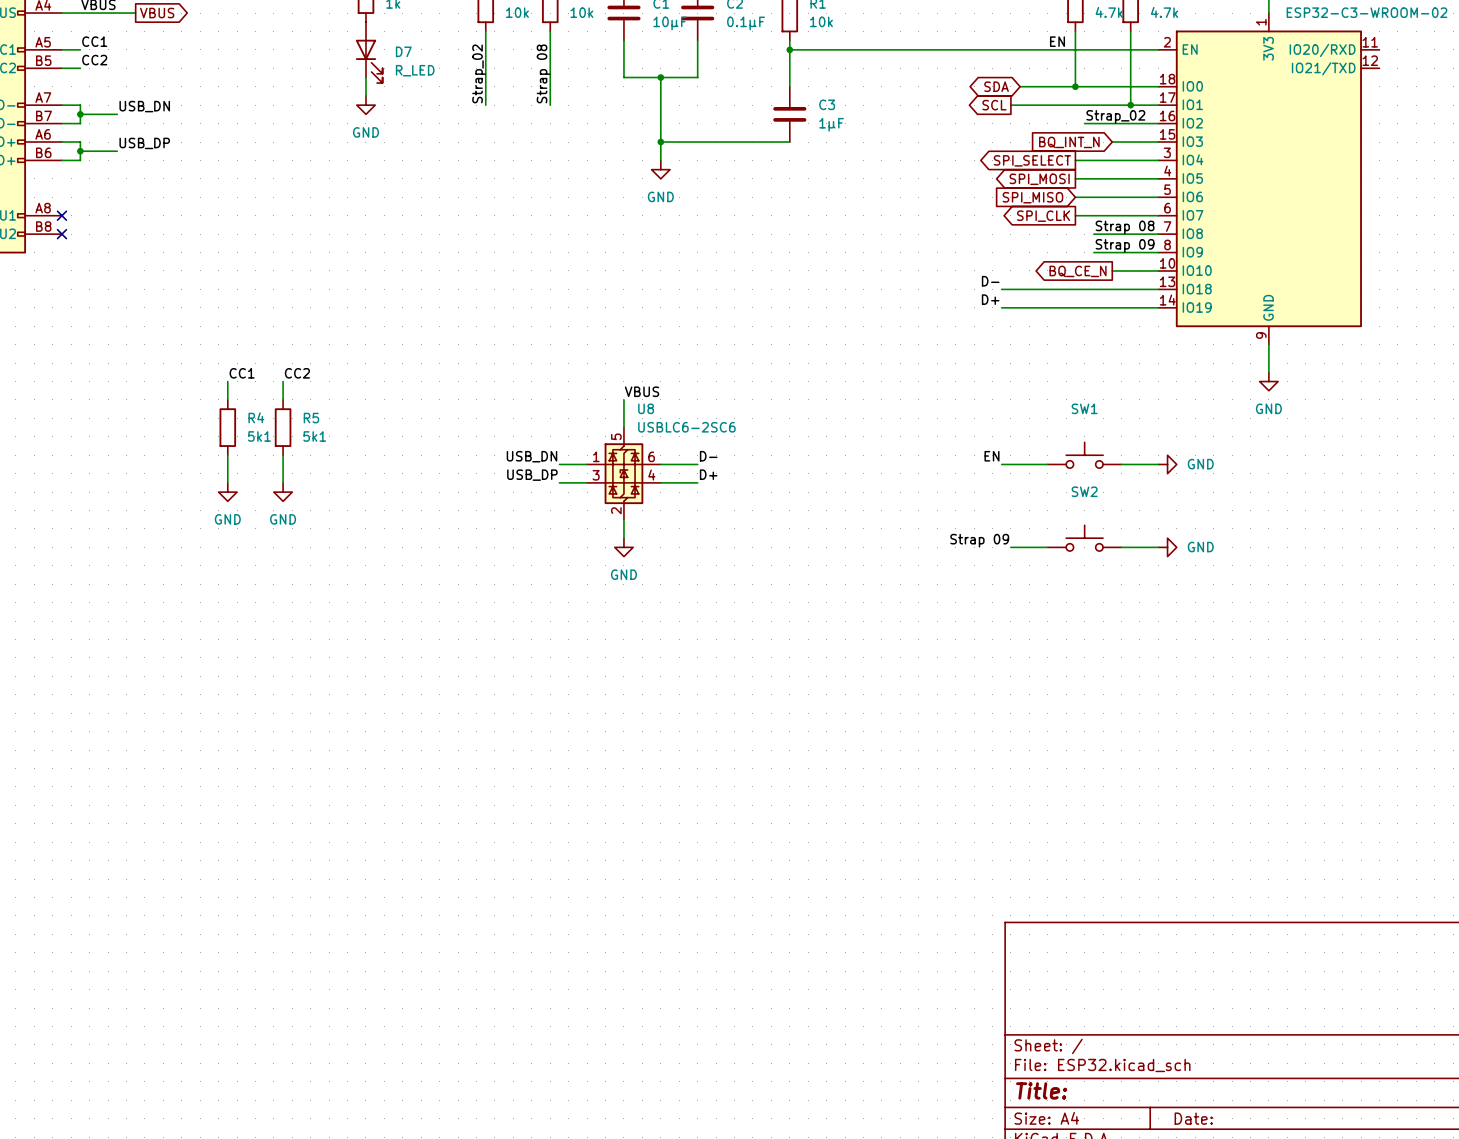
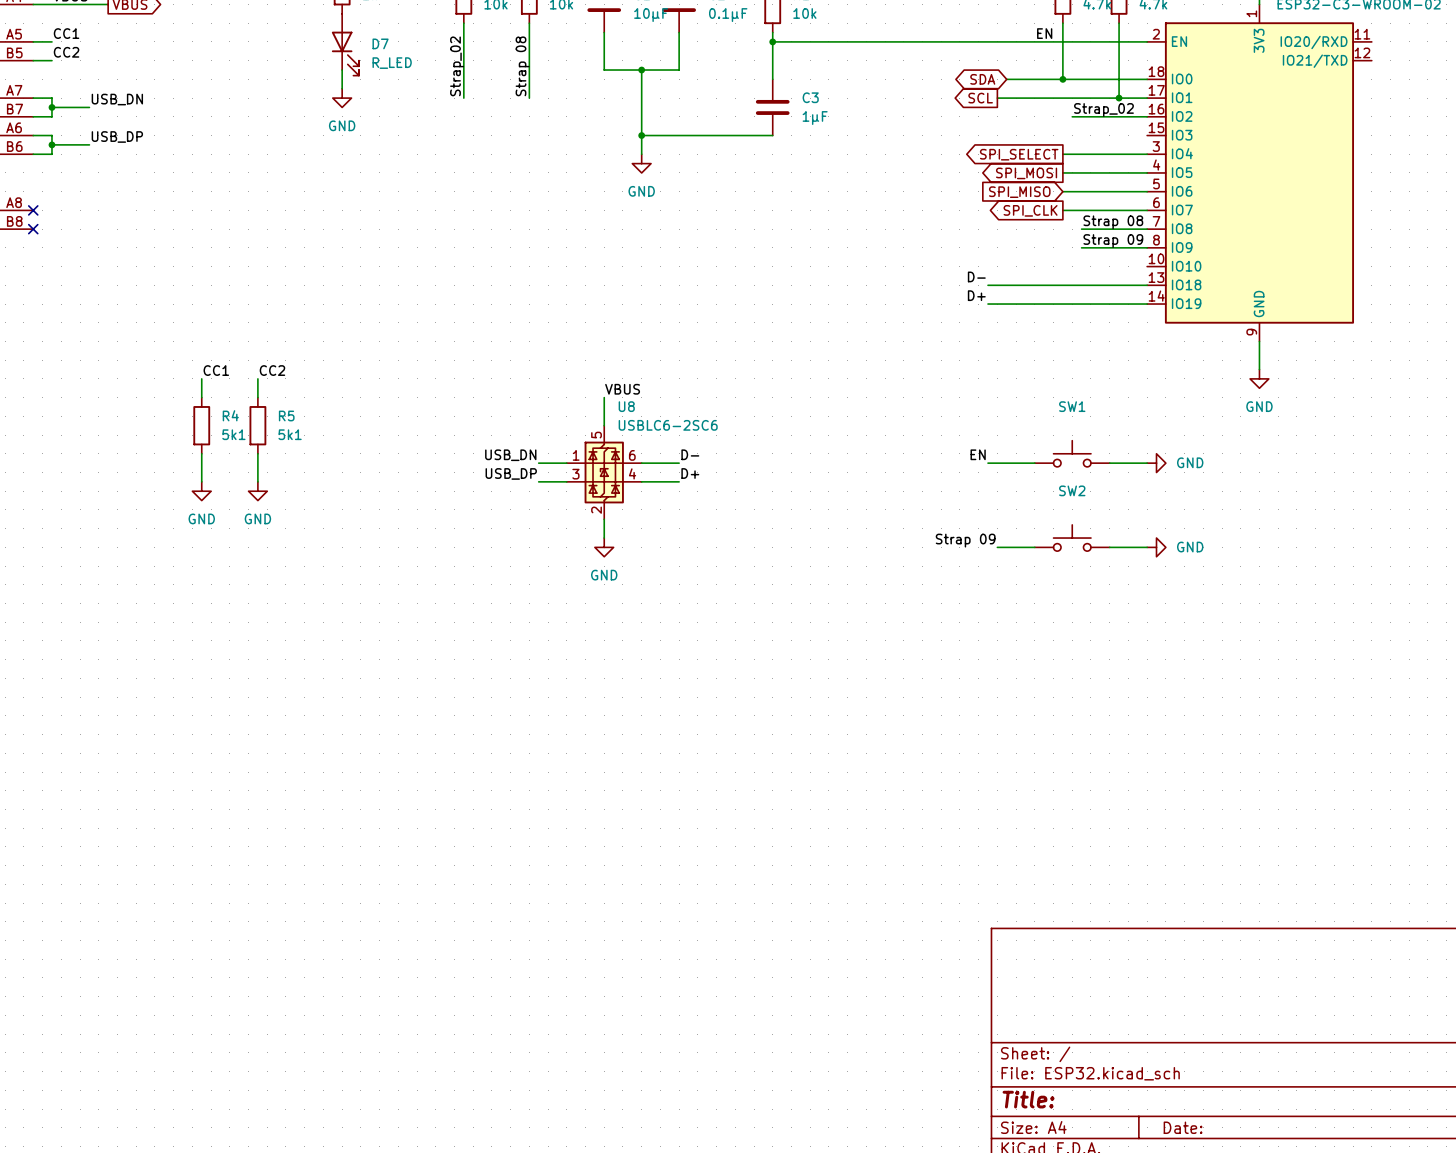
global label: BQ_INT_N (1069, 142) -> none
wire: (1112, 142) (1158, 142) -> none
wire: (1112, 270) (1158, 270) -> none
global label: BQ_CE_N (1078, 271) -> none

